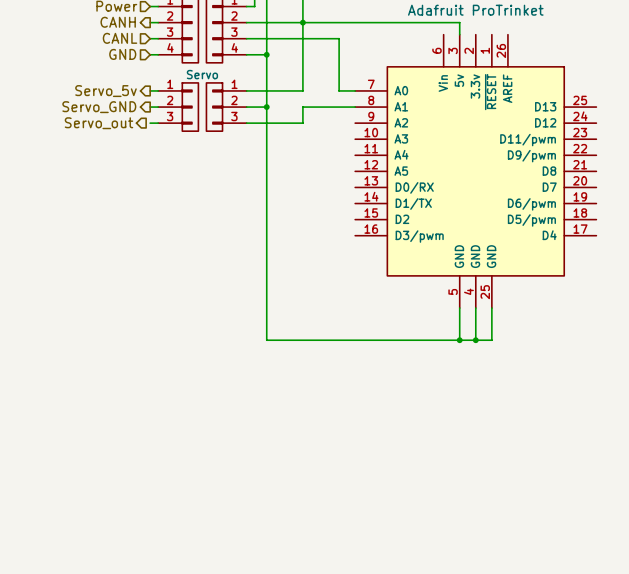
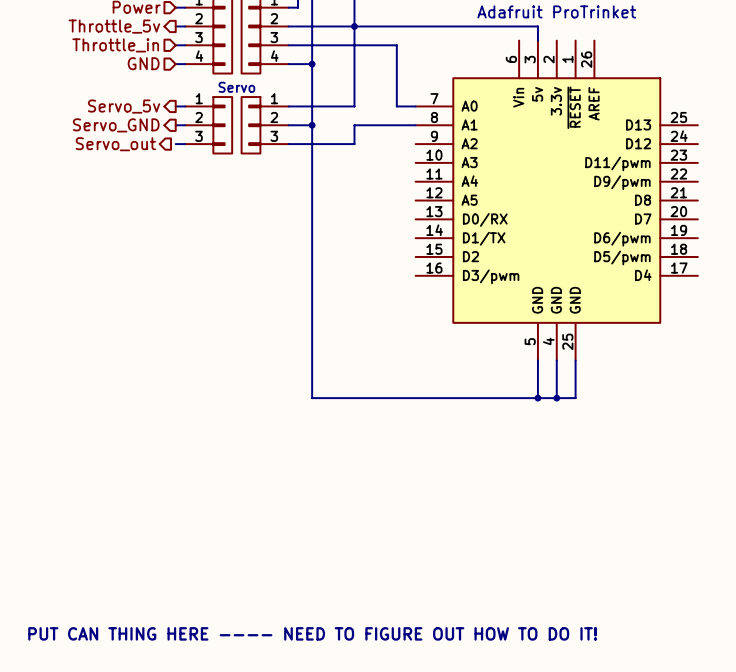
hierarchical label: CANH (118, 22) -> Throttle_5v (114, 26)
hierarchical label: CANL (120, 38) -> Throttle_in (115, 45)
text: none -> PUT CAN THING HERE ---- NEED TO FIGURE OUT HOW TO DO IT! (312, 633)

